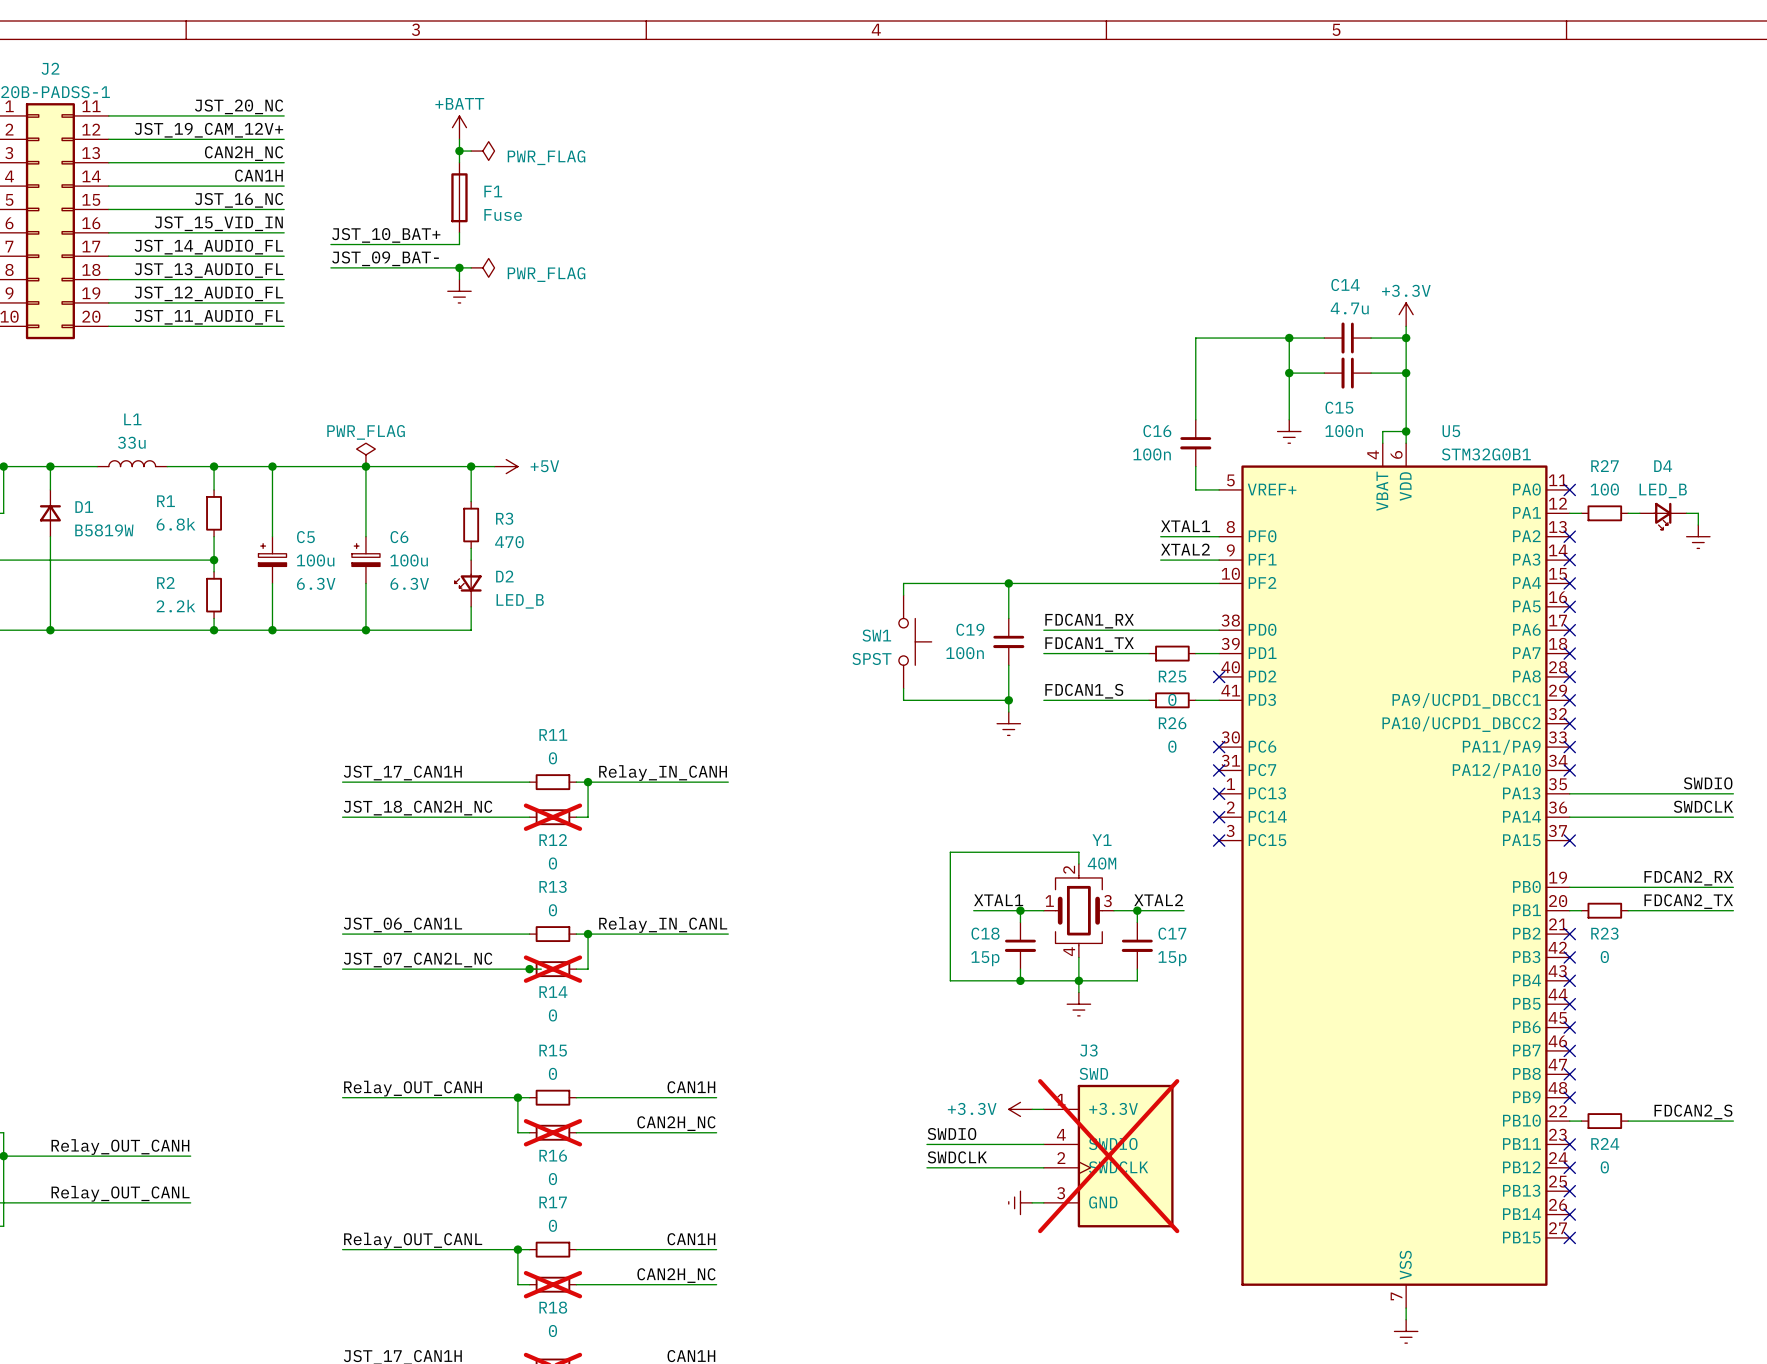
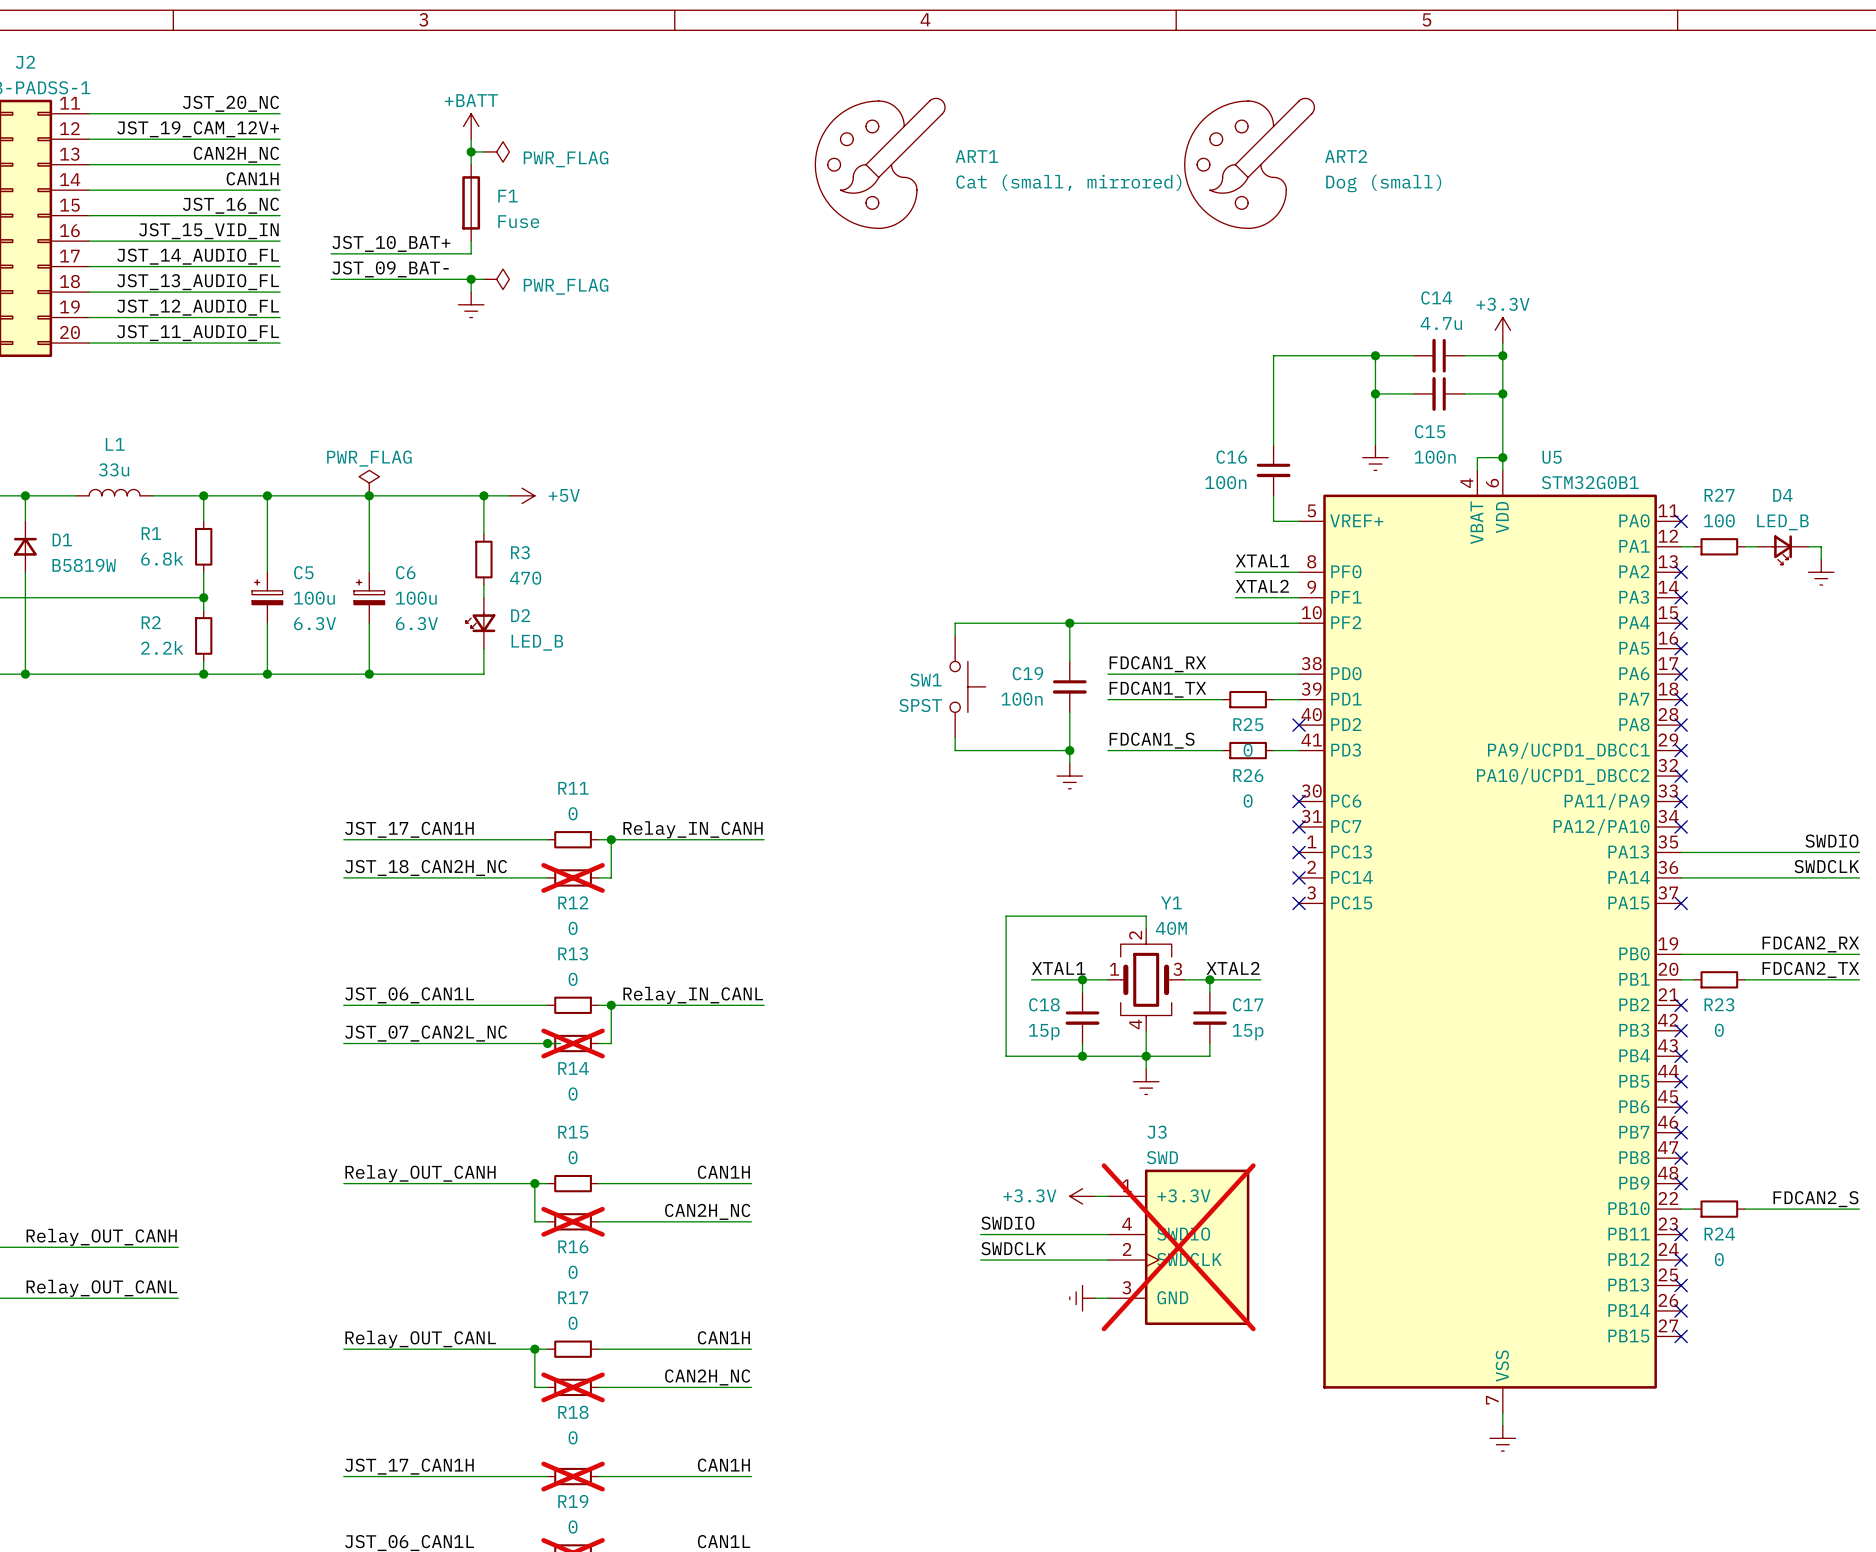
ART1: none -> Cat (small, mirrored) (880, 163)
ART2: none -> Dog (small) (1249, 163)

